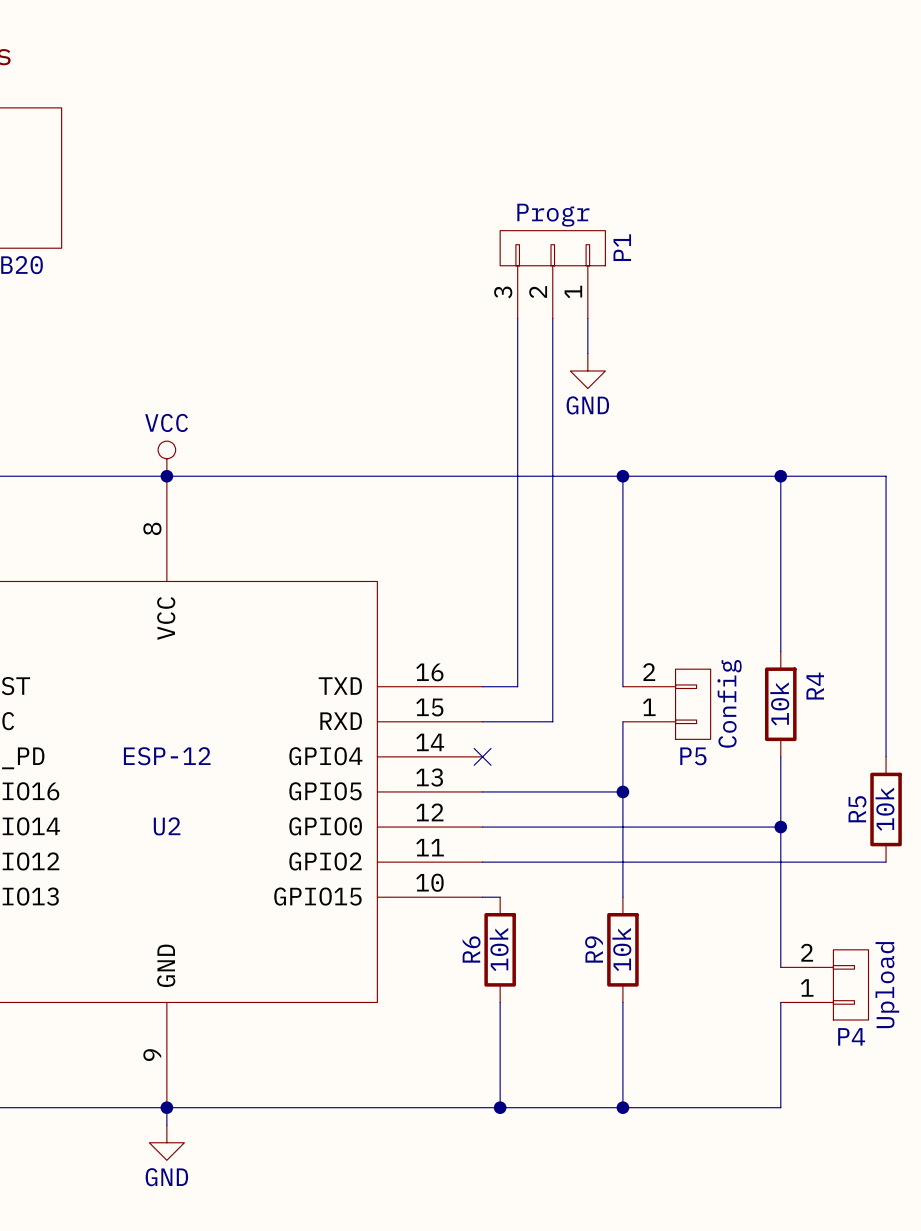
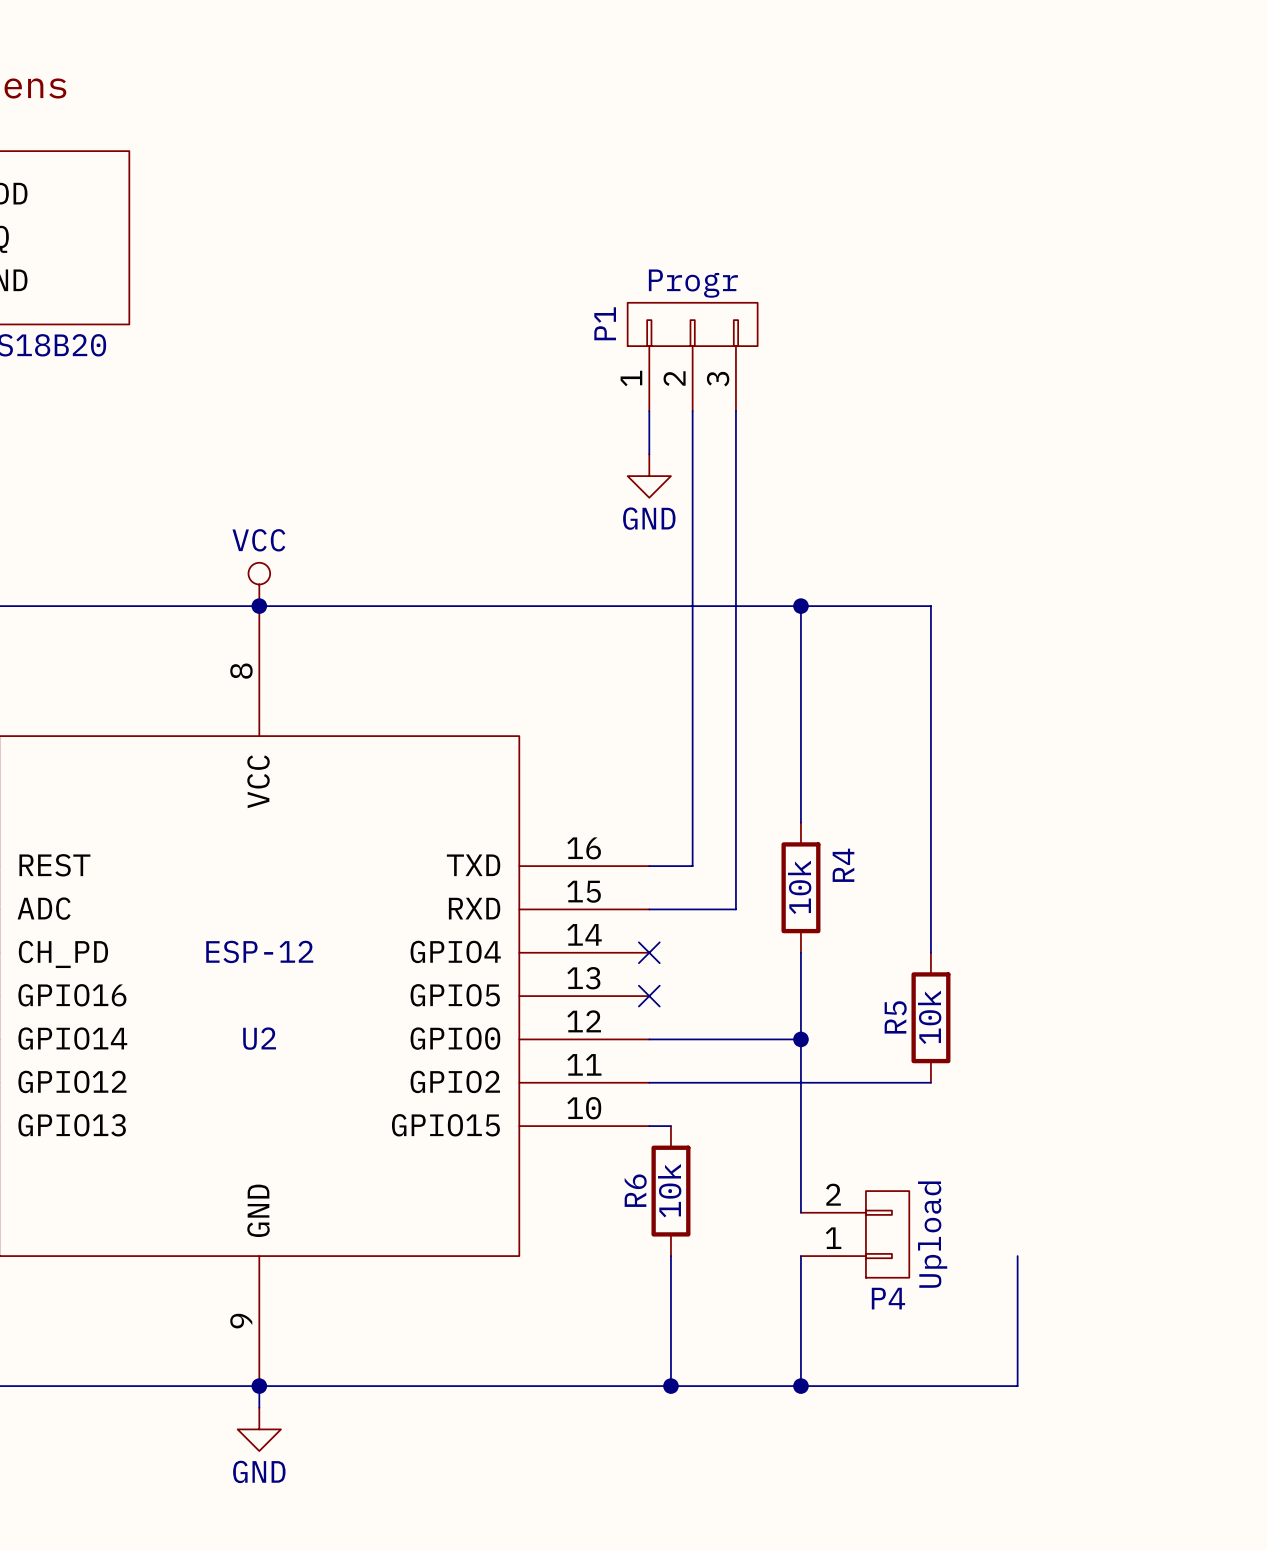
P1 flip: as is (552, 248) -> left-right (692, 324)
wire: (587, 318) (587, 353) -> (649, 411) (649, 454)
power symbol position: GND (587, 370) -> GND (649, 476)
wire: (622, 476) (622, 686) -> none
junction position: (622, 476) -> (800, 606)
wire: (710, 476) (886, 476) (886, 756) -> (930, 606) (930, 952)
wire: (780, 476) (780, 651) -> (800, 606) (800, 822)
junction: (780, 476) -> none
P5: Config (666, 704) -> none
R4 position: (780, 704) -> (800, 887)
wire: (622, 721) (622, 897) -> none
wire: (780, 756) (780, 967) -> (800, 952) (800, 1212)
wire: (482, 791) (622, 791) -> none
no-connect mark: none -> (649, 996)
junction position: (622, 791) -> (800, 1039)
R5 position: (886, 809) -> (930, 1017)
wire: (605, 827) (780, 827) -> none
junction: (780, 827) -> none
wire: (710, 862) (886, 862) -> none
R9: 10k (622, 949) -> none
P4 position: (824, 984) -> (855, 1234)
wire: (622, 1002) (622, 1107) -> (800, 1256) (800, 1386)
junction position: (622, 1107) -> (800, 1386)

